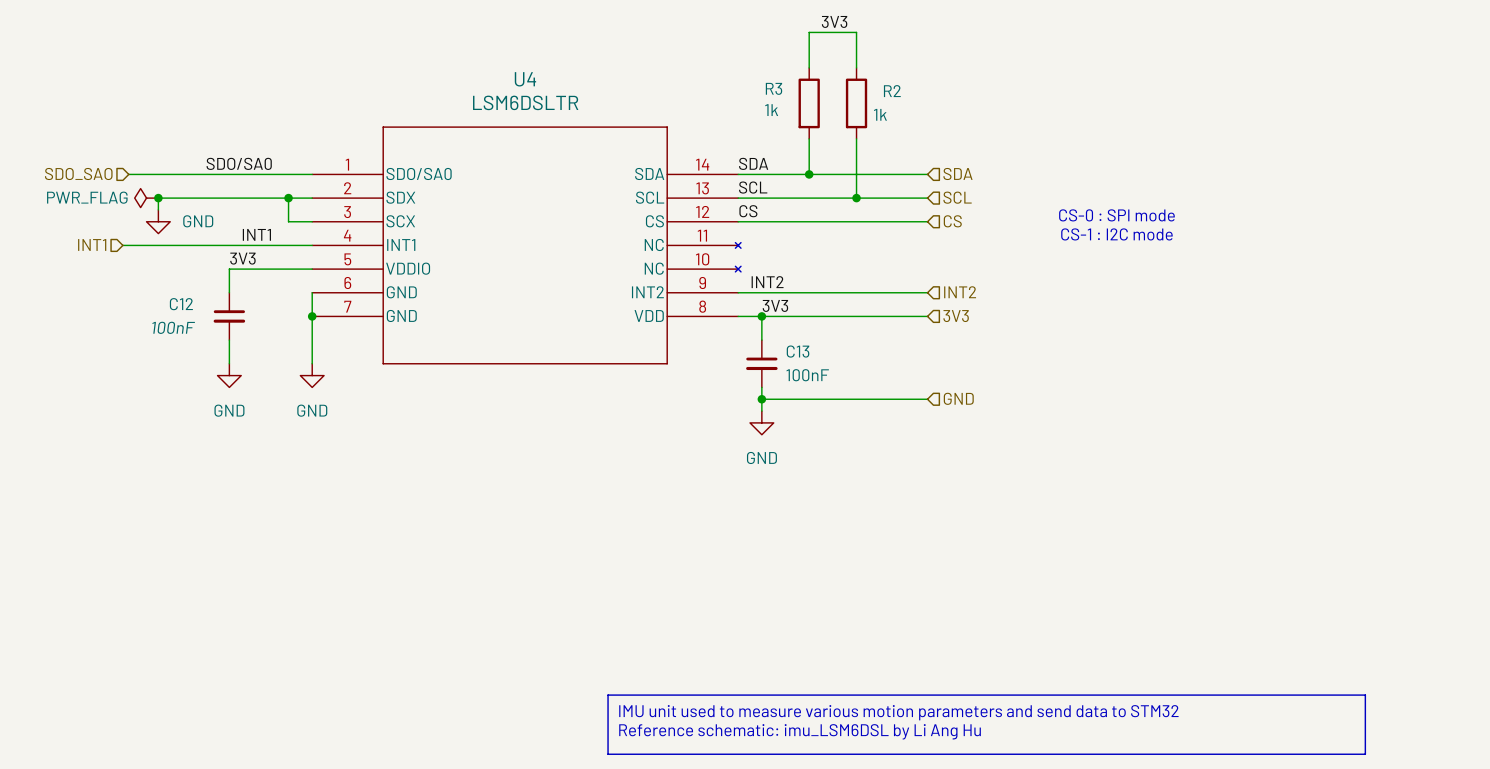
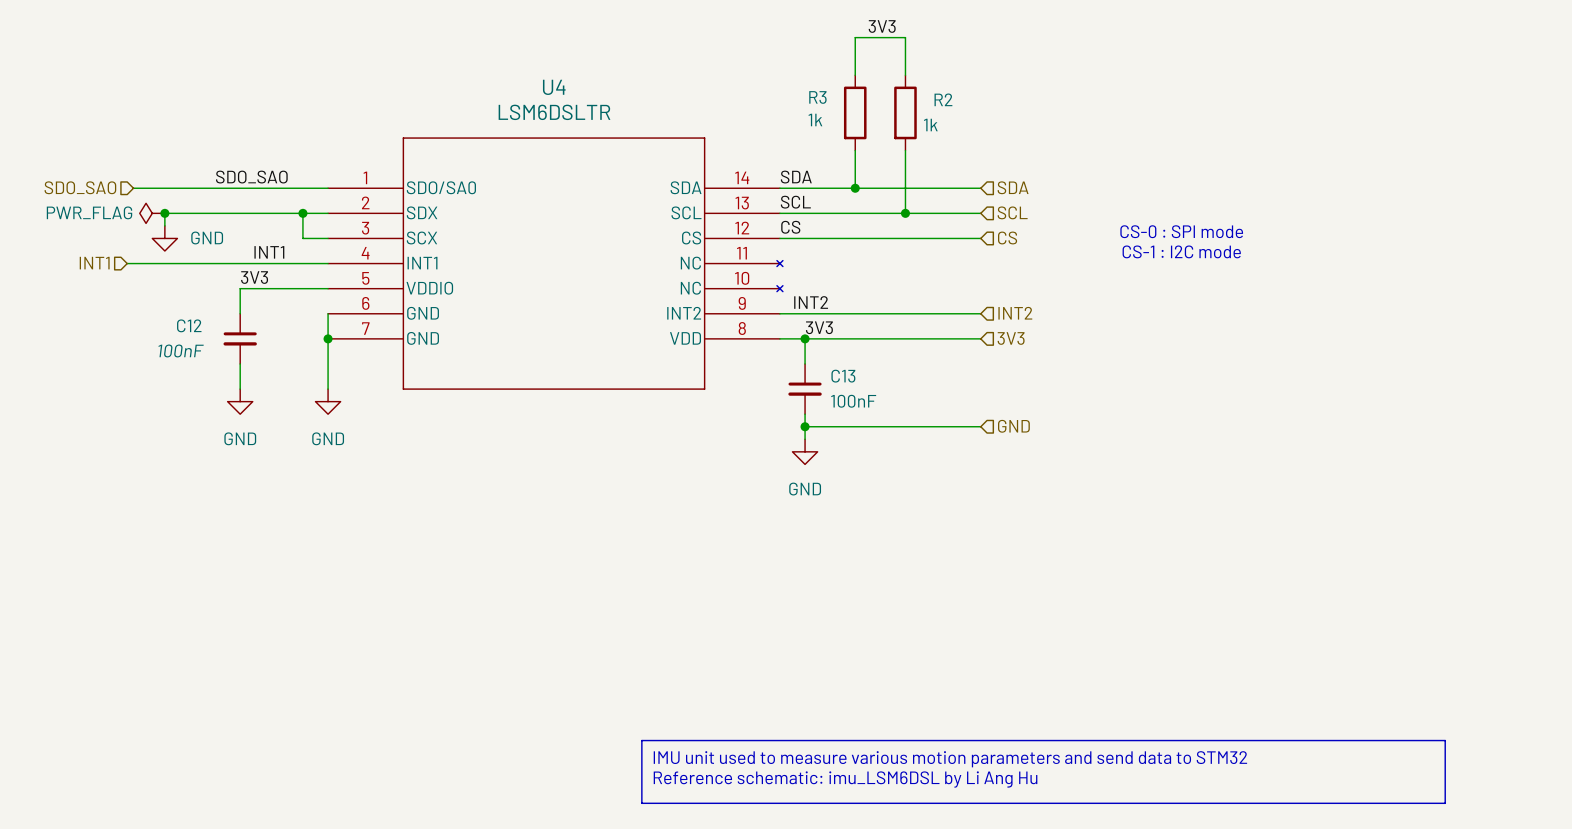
label: SDO/SA0 (239, 163) -> SDO_SAO (251, 177)

